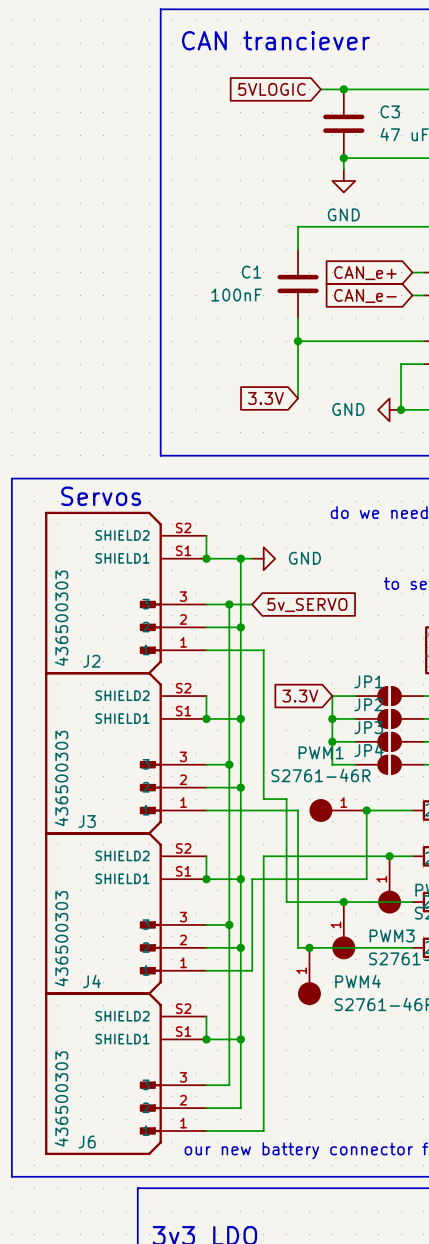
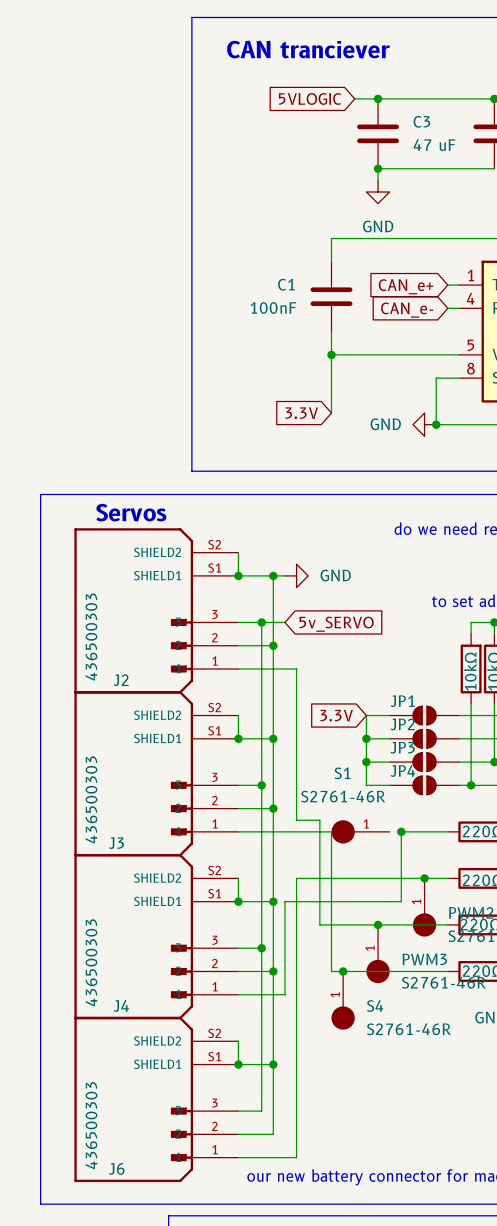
S1: none -> S2761-46R (360, 831)
PWM1: S2761-46R (338, 810) -> none
PWM4 name: PWM4 (358, 981) -> S4 (375, 1006)

